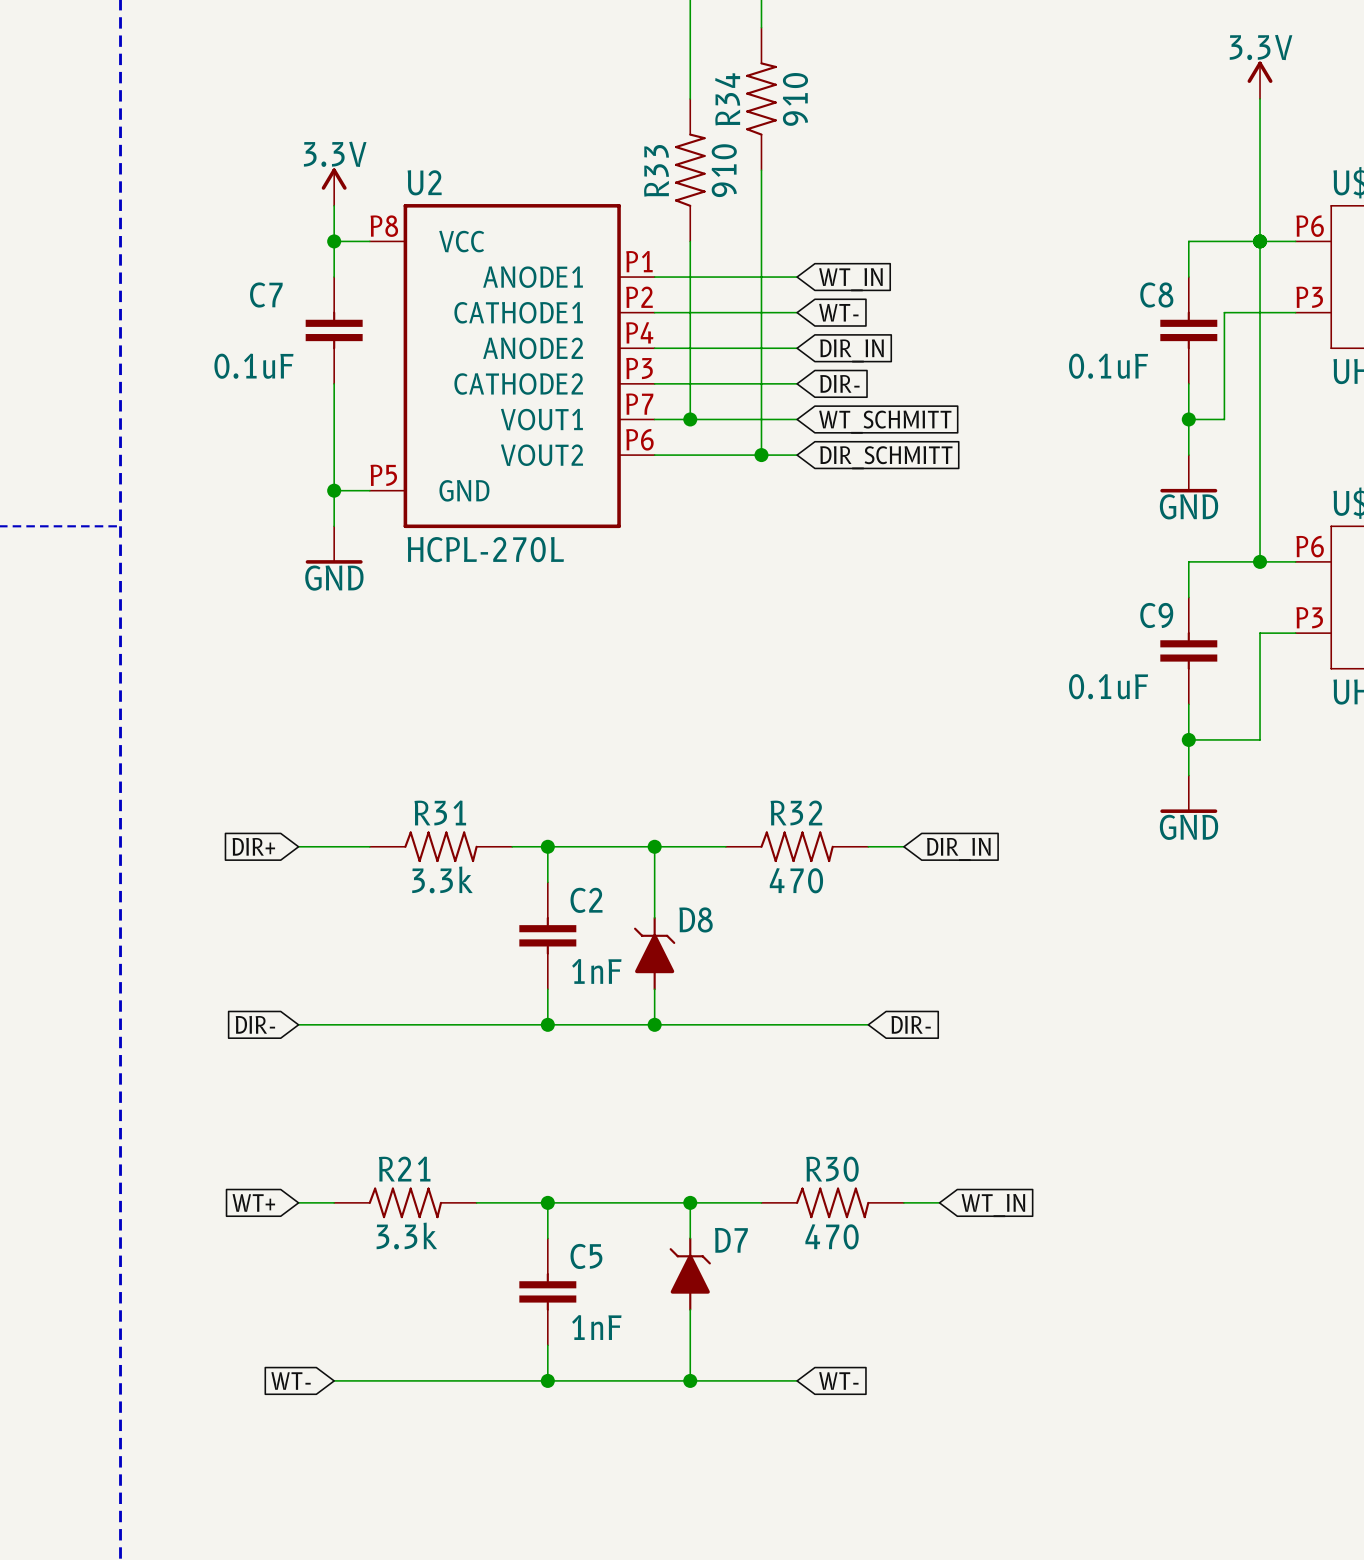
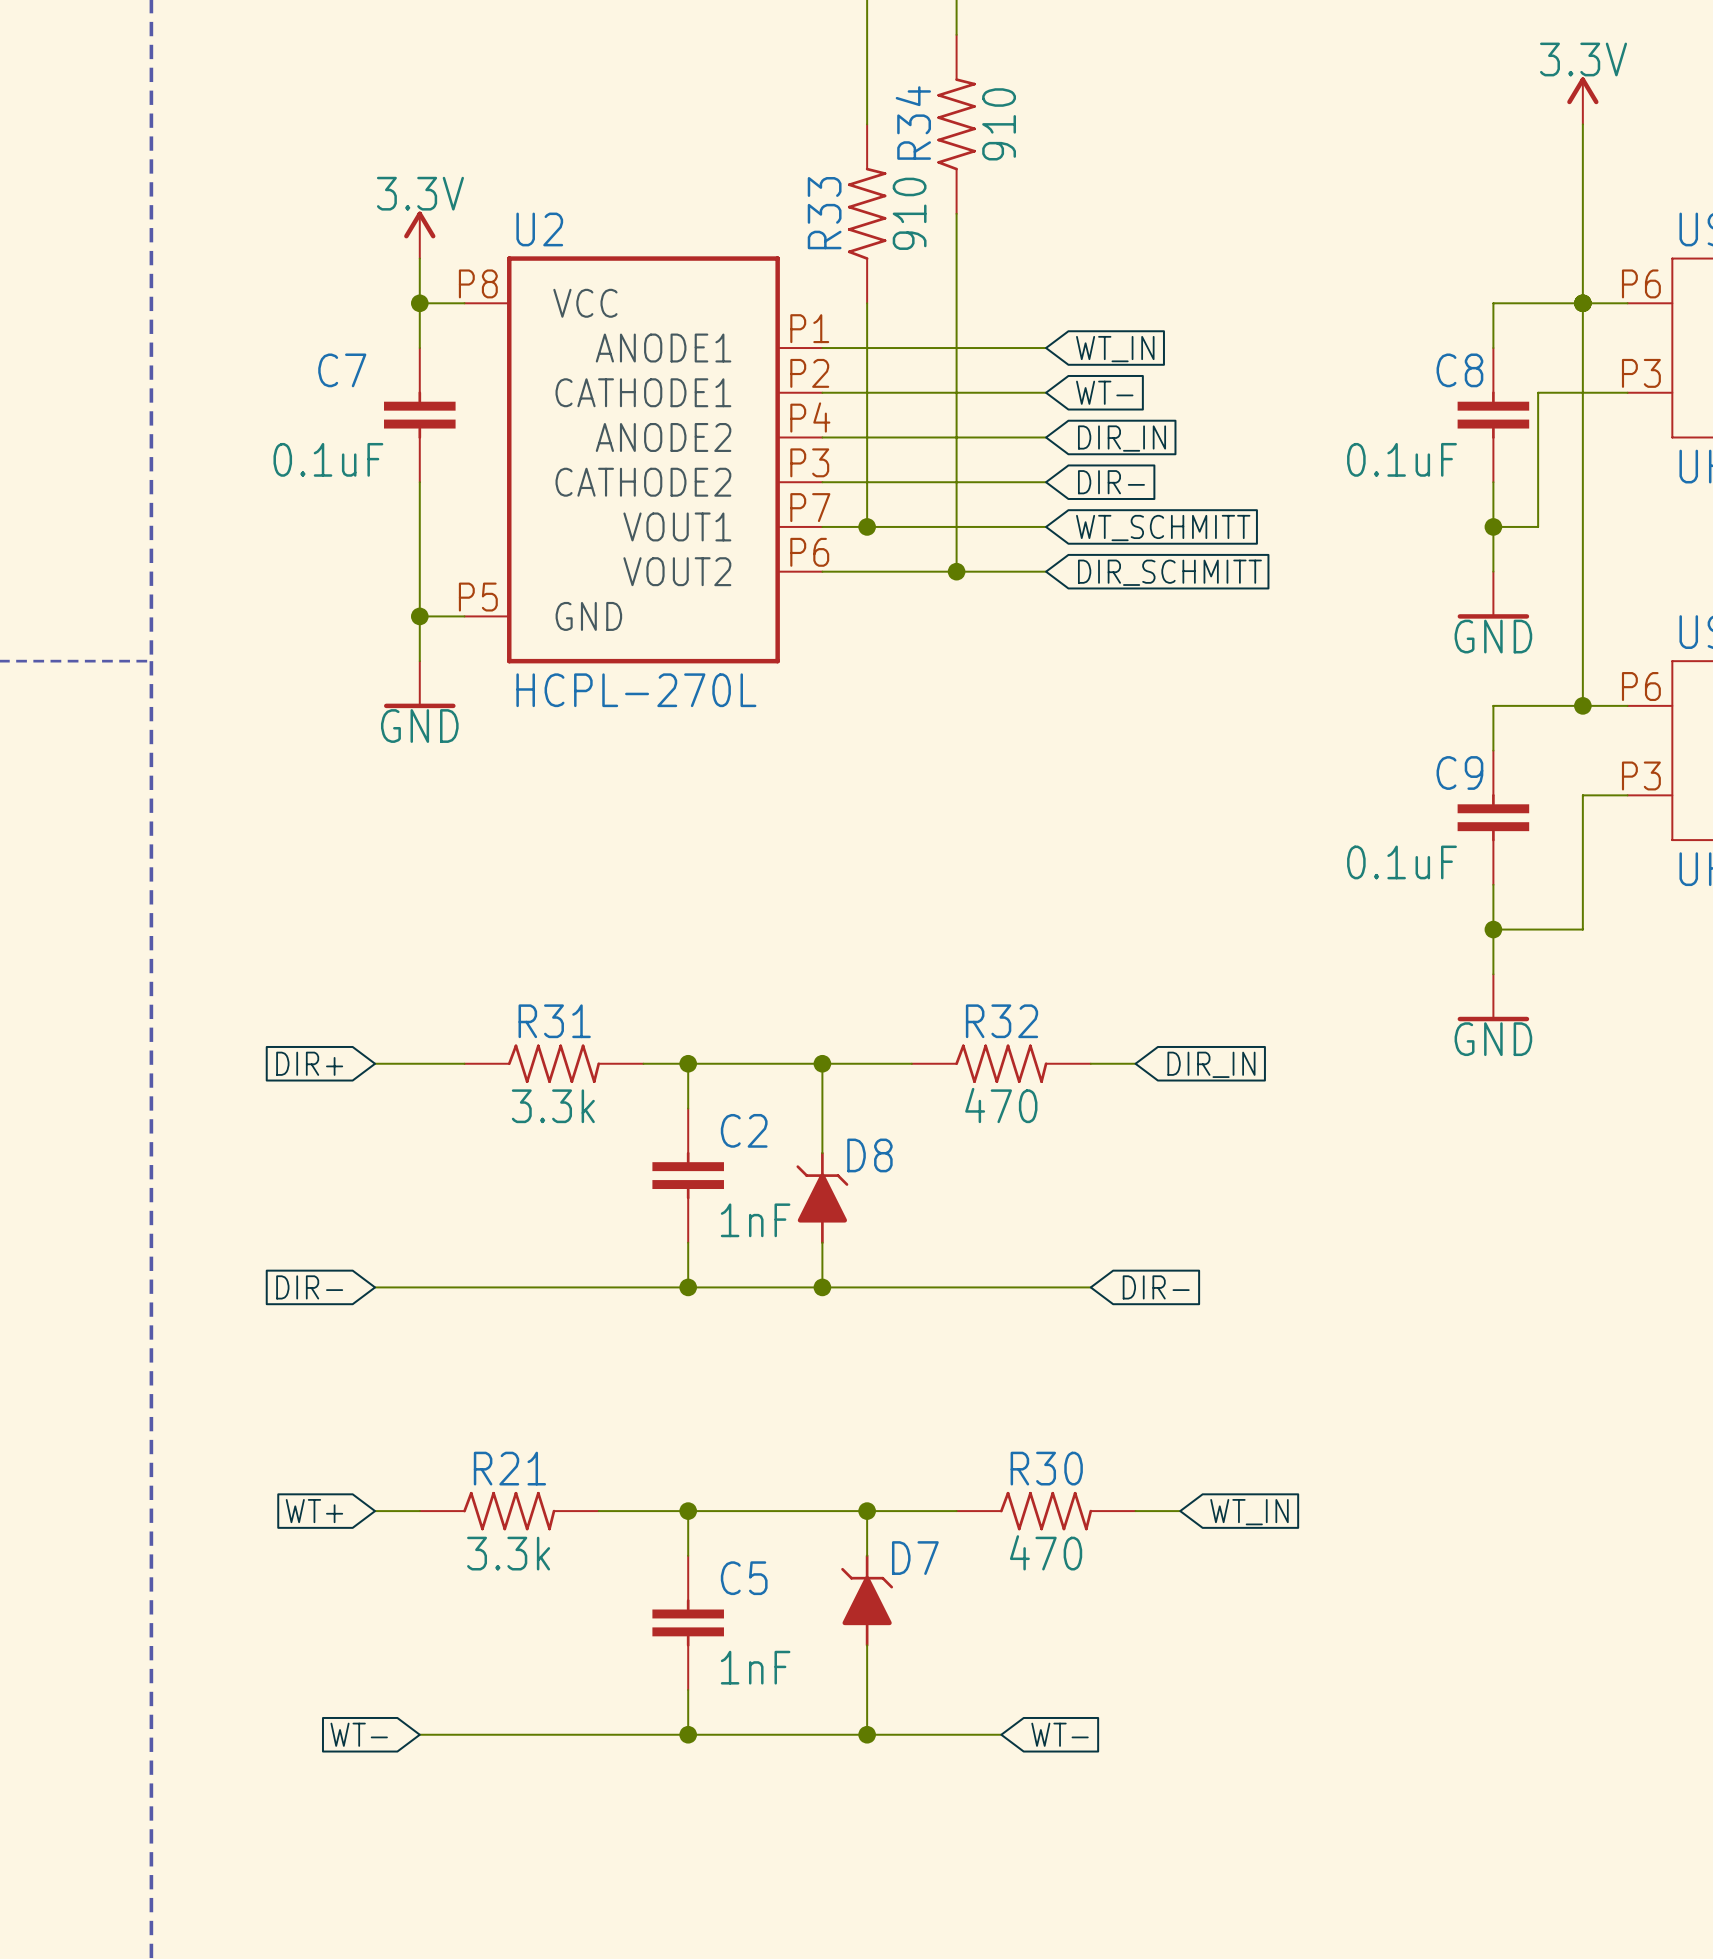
wire: none -> (1001, 348) (1046, 348)
global label position: WT_IN (850, 279) -> WT_IN (1115, 349)
wire: none -> (1001, 392) (1046, 392)
global label position: WT- (838, 312) -> WT- (1104, 392)
wire: none -> (1001, 437) (1046, 437)
global label position: DIR_IN (852, 350) -> DIR_IN (1122, 438)
wire: none -> (1001, 482) (1046, 482)
global label position: DIR- (839, 383) -> DIR- (1111, 482)
wire: none -> (1001, 526) (1046, 526)
global label position: WT_SCHMITT (885, 422) -> WT_SCHMITT (1163, 528)
wire: none -> (1001, 571) (1046, 571)
global label position: DIR_SCHMITT (886, 457) -> DIR_SCHMITT (1169, 572)

